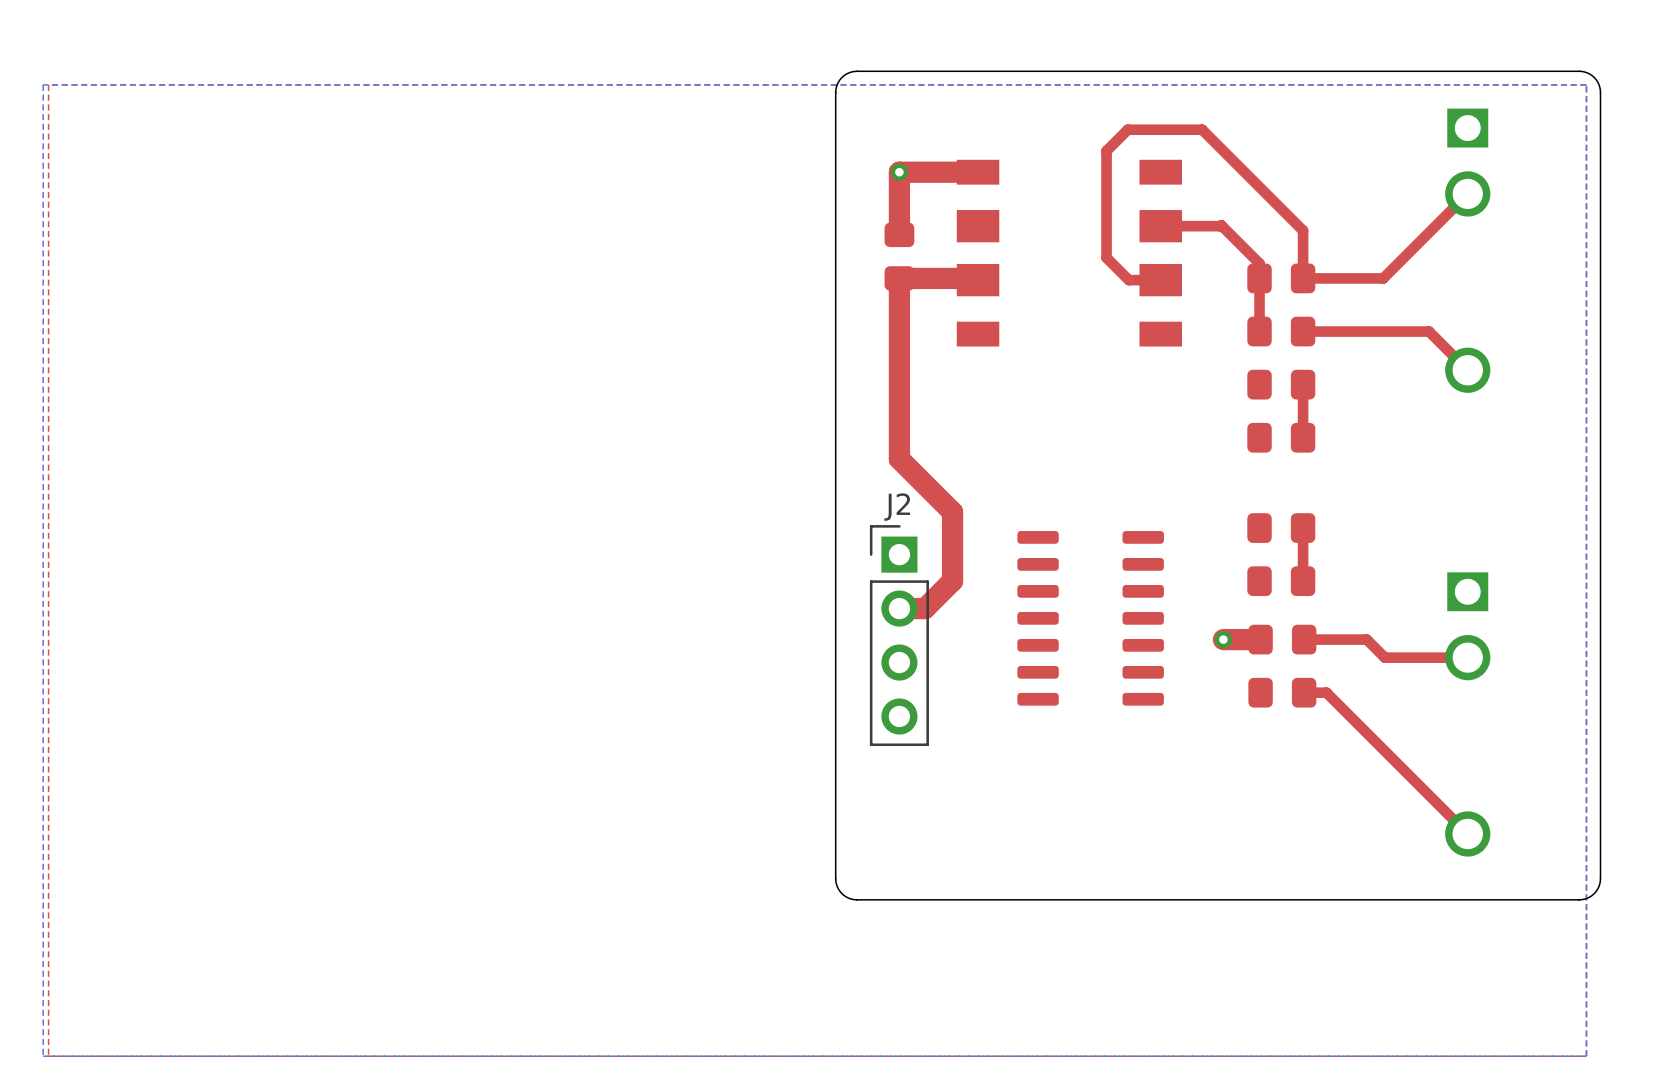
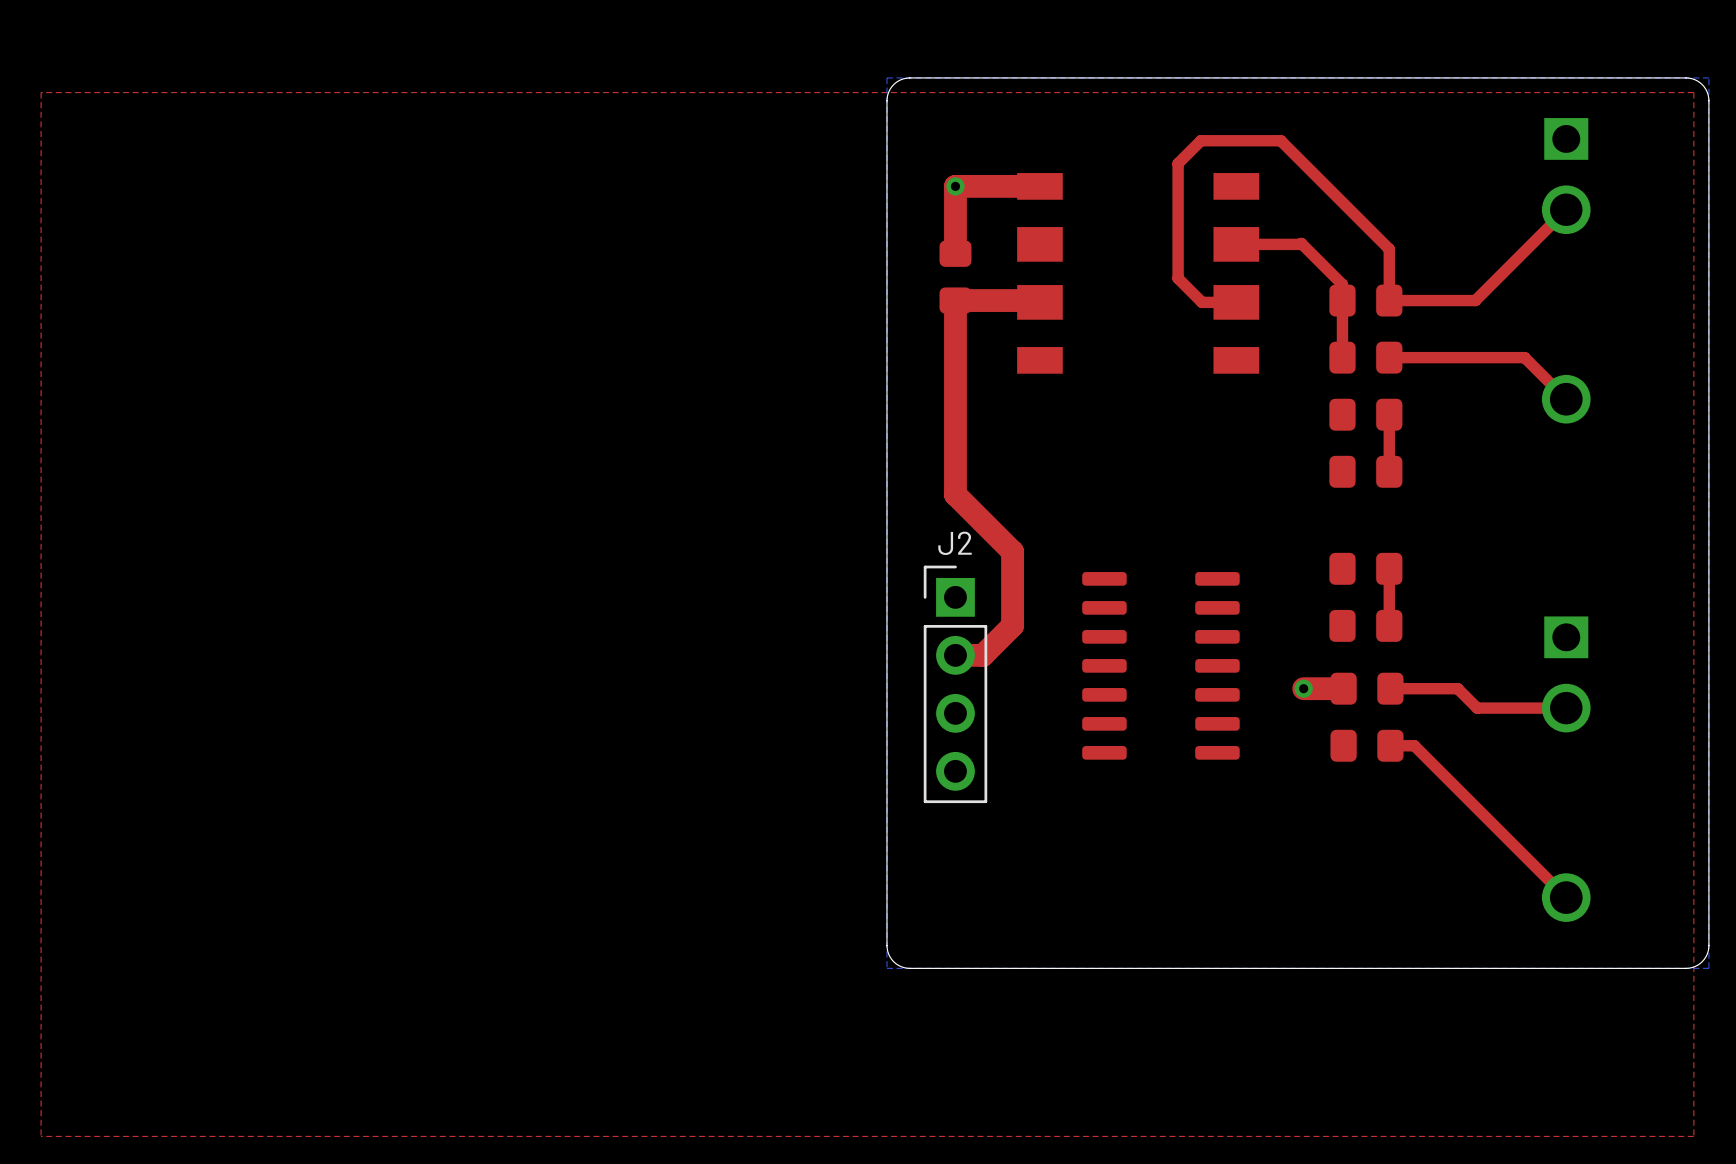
bottom zone outline: none -> (1708, 77) (1708, 968) (886, 968) (886, 77) (1708, 77)
bottom zone outline: (1586, 84) (1586, 1056) (43, 1056) (43, 84) (1586, 84) -> none

